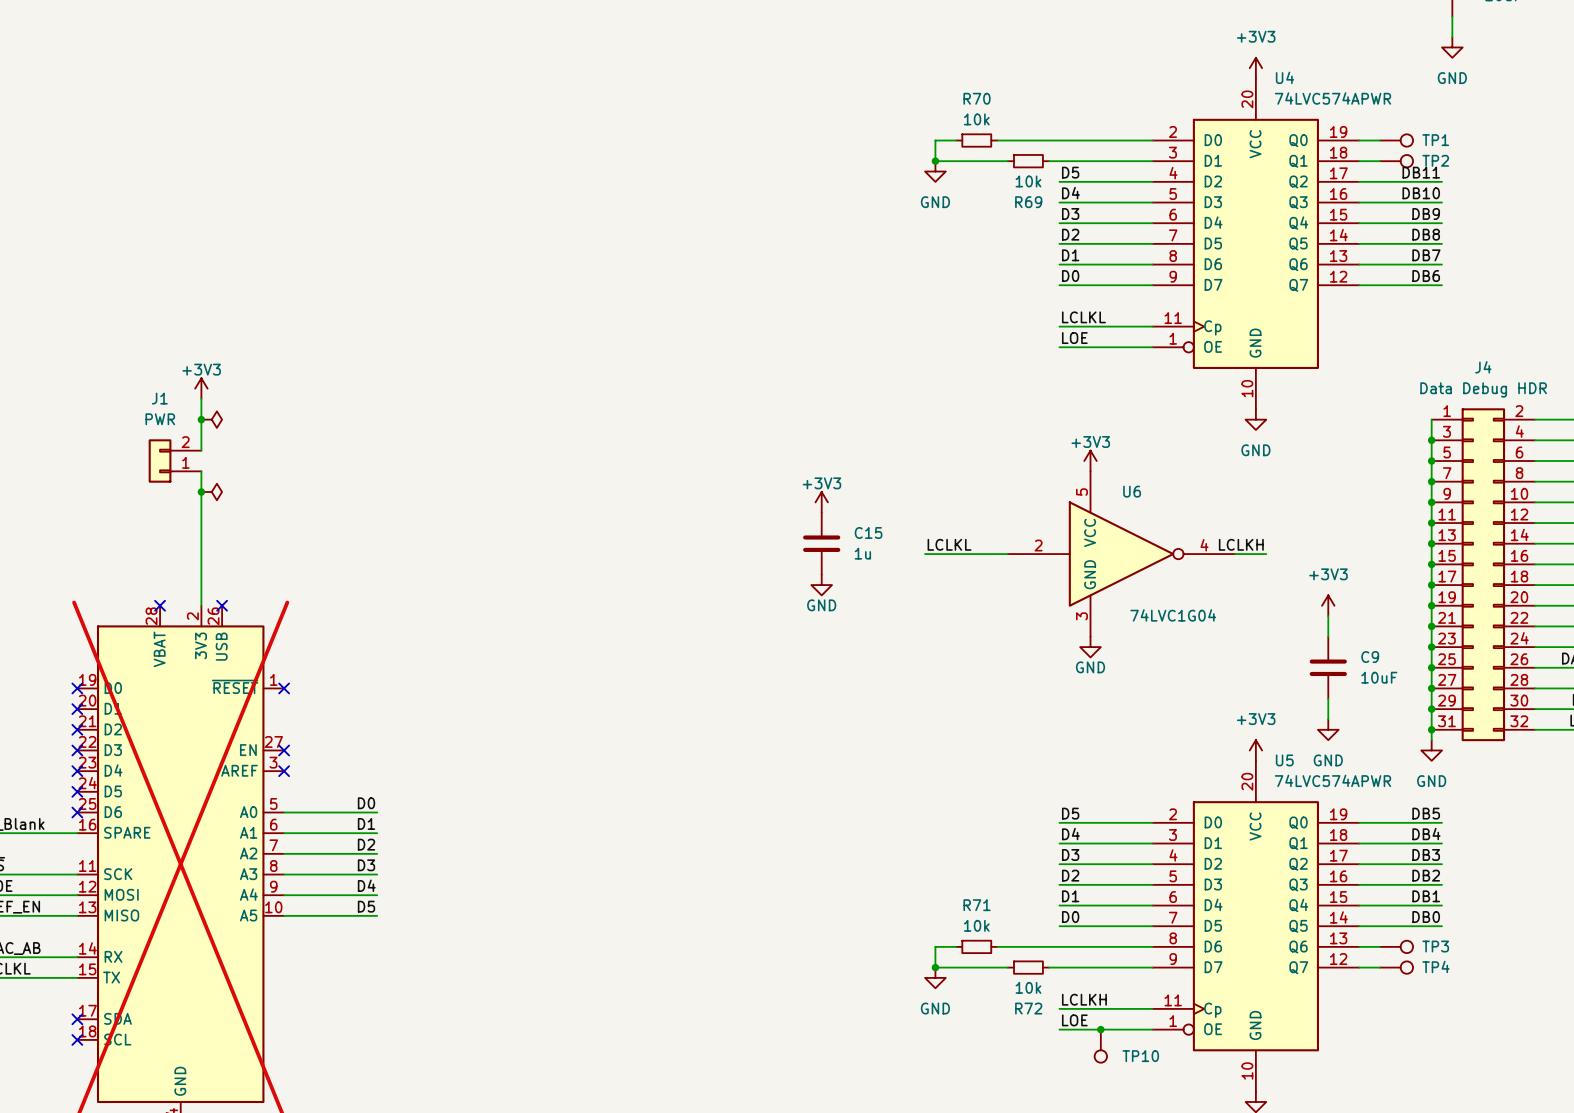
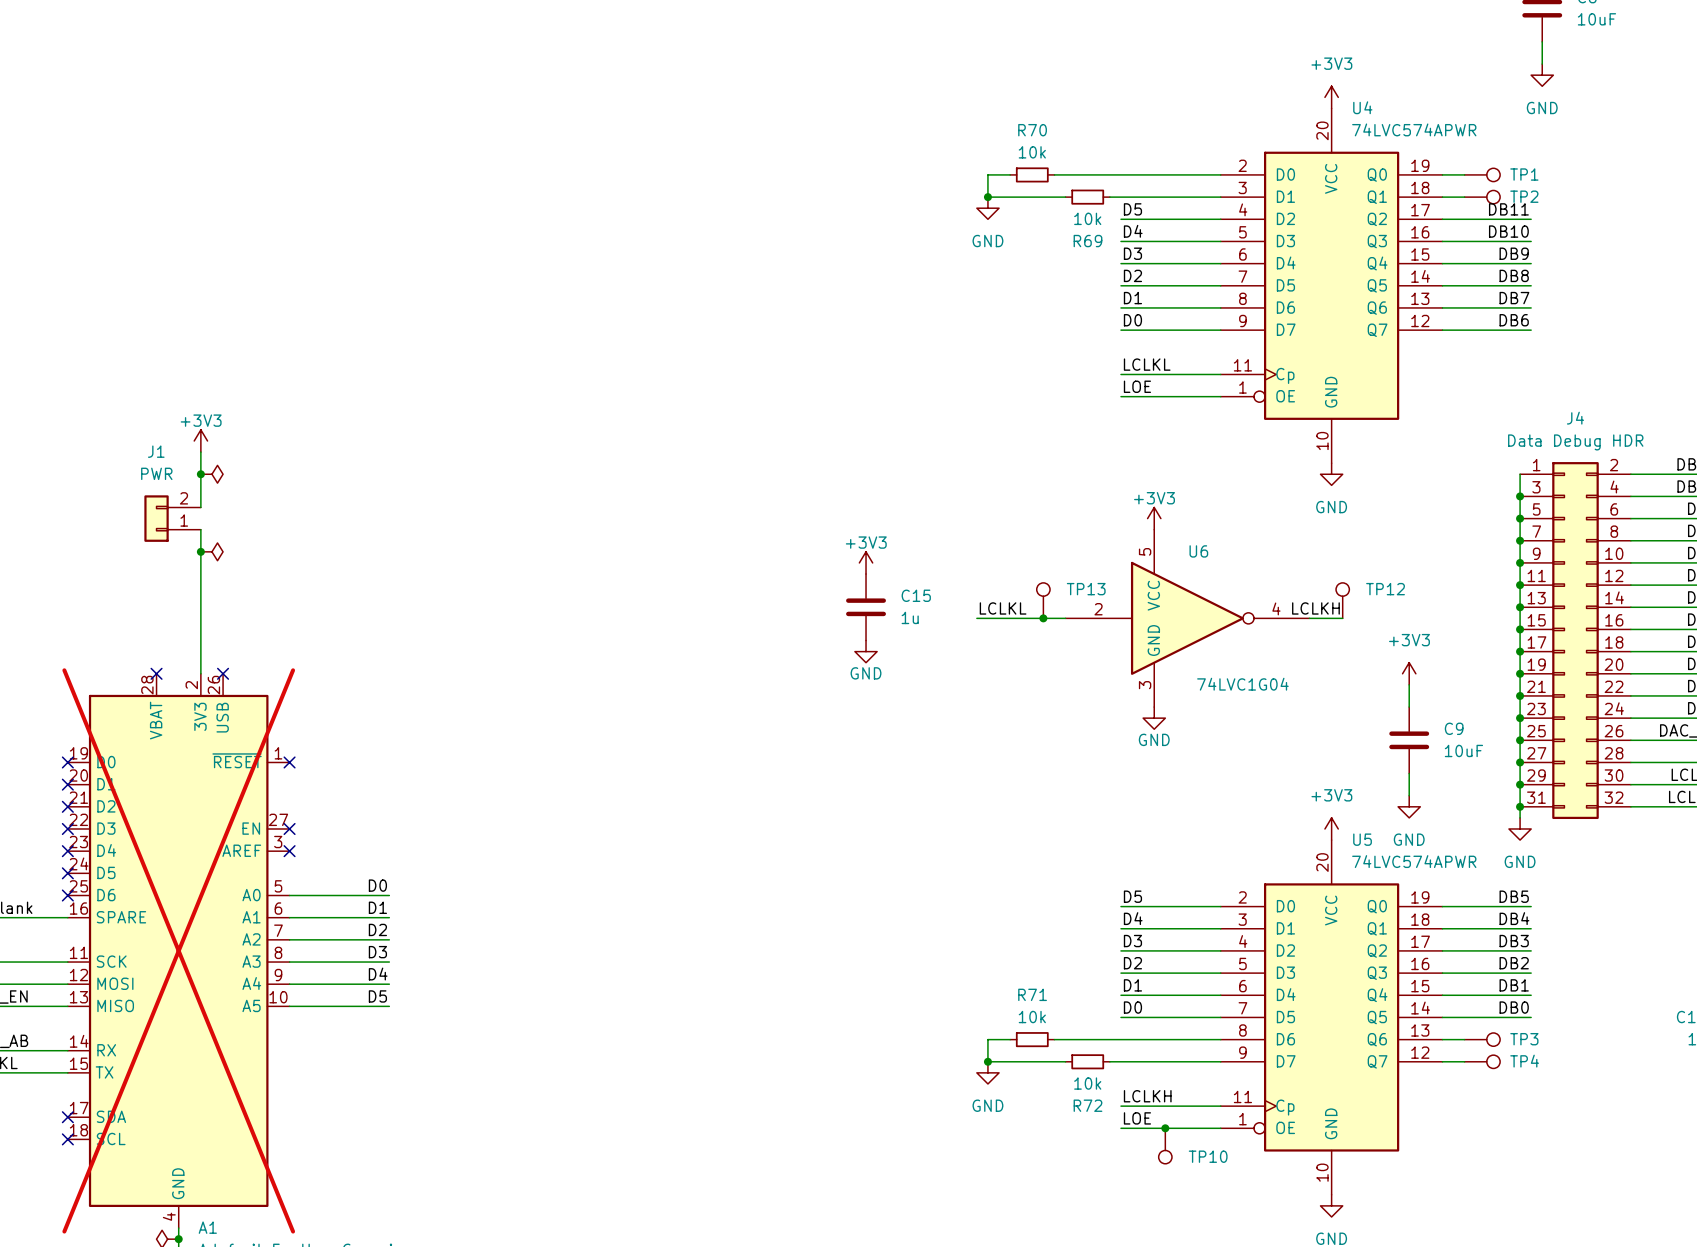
TP13: none -> (1043, 600)
TP12: none -> (1342, 600)
junction: none -> (1043, 618)

